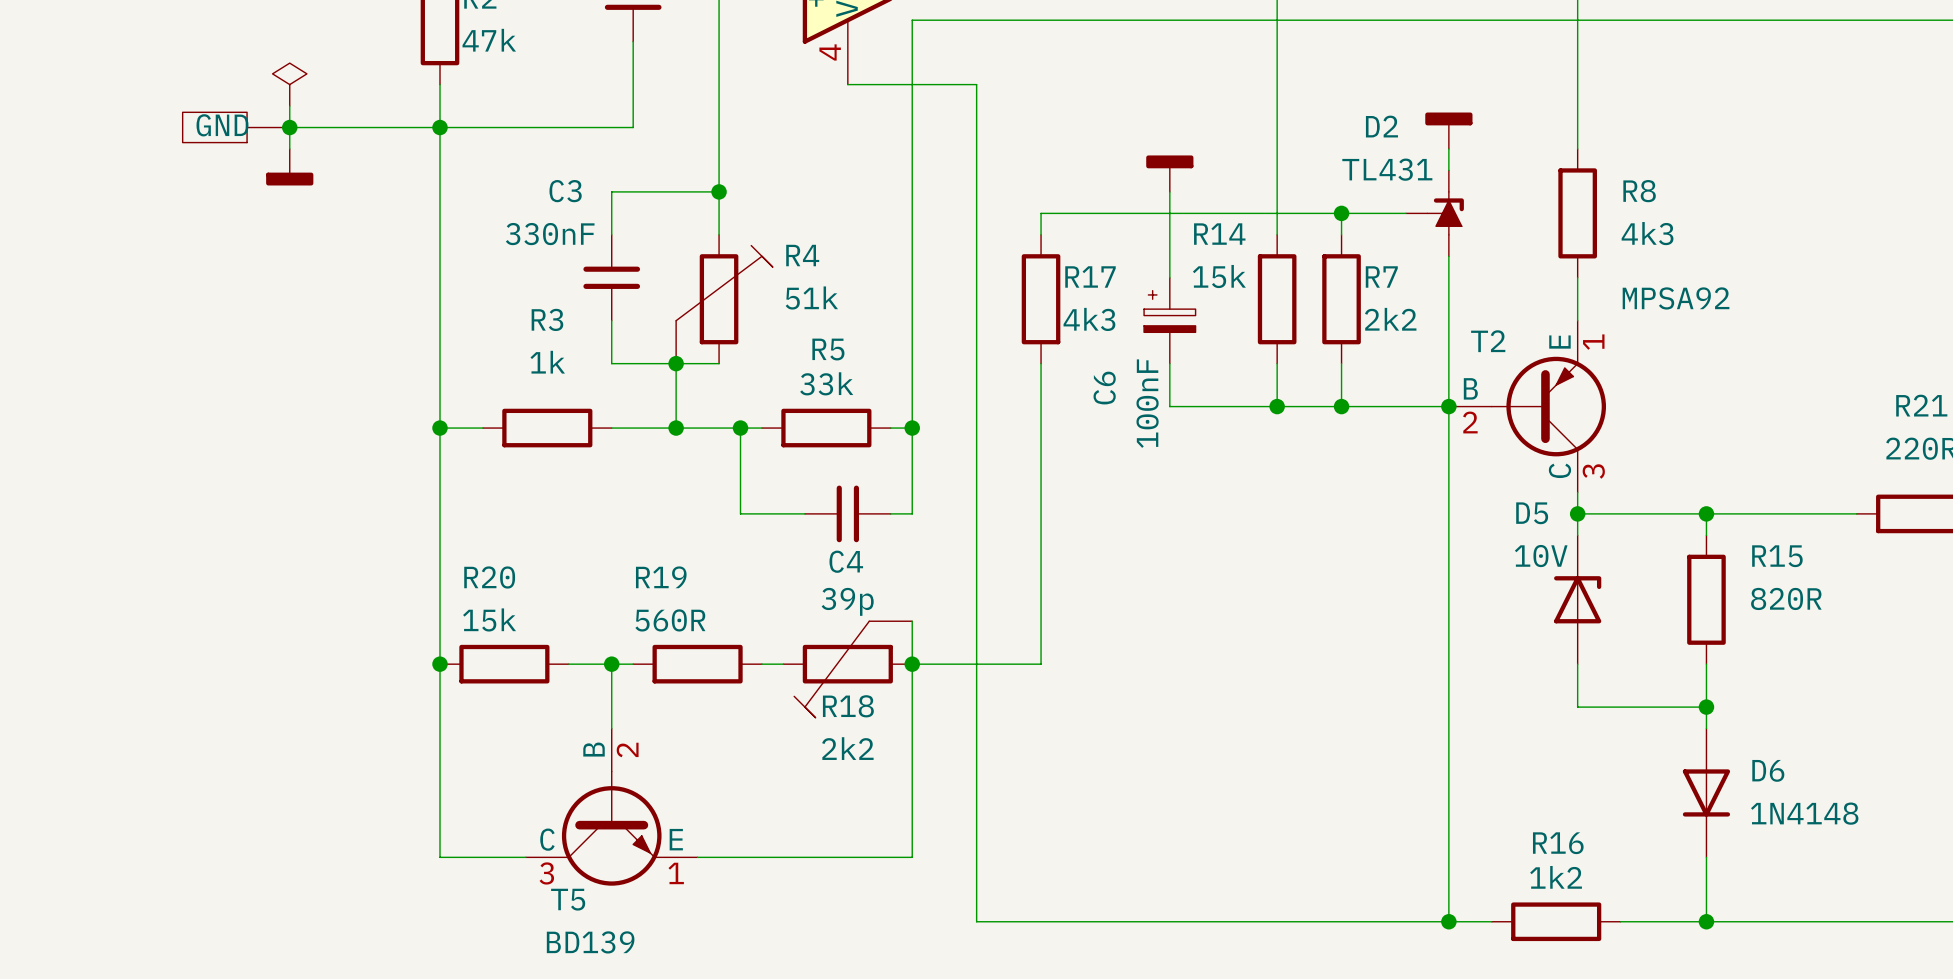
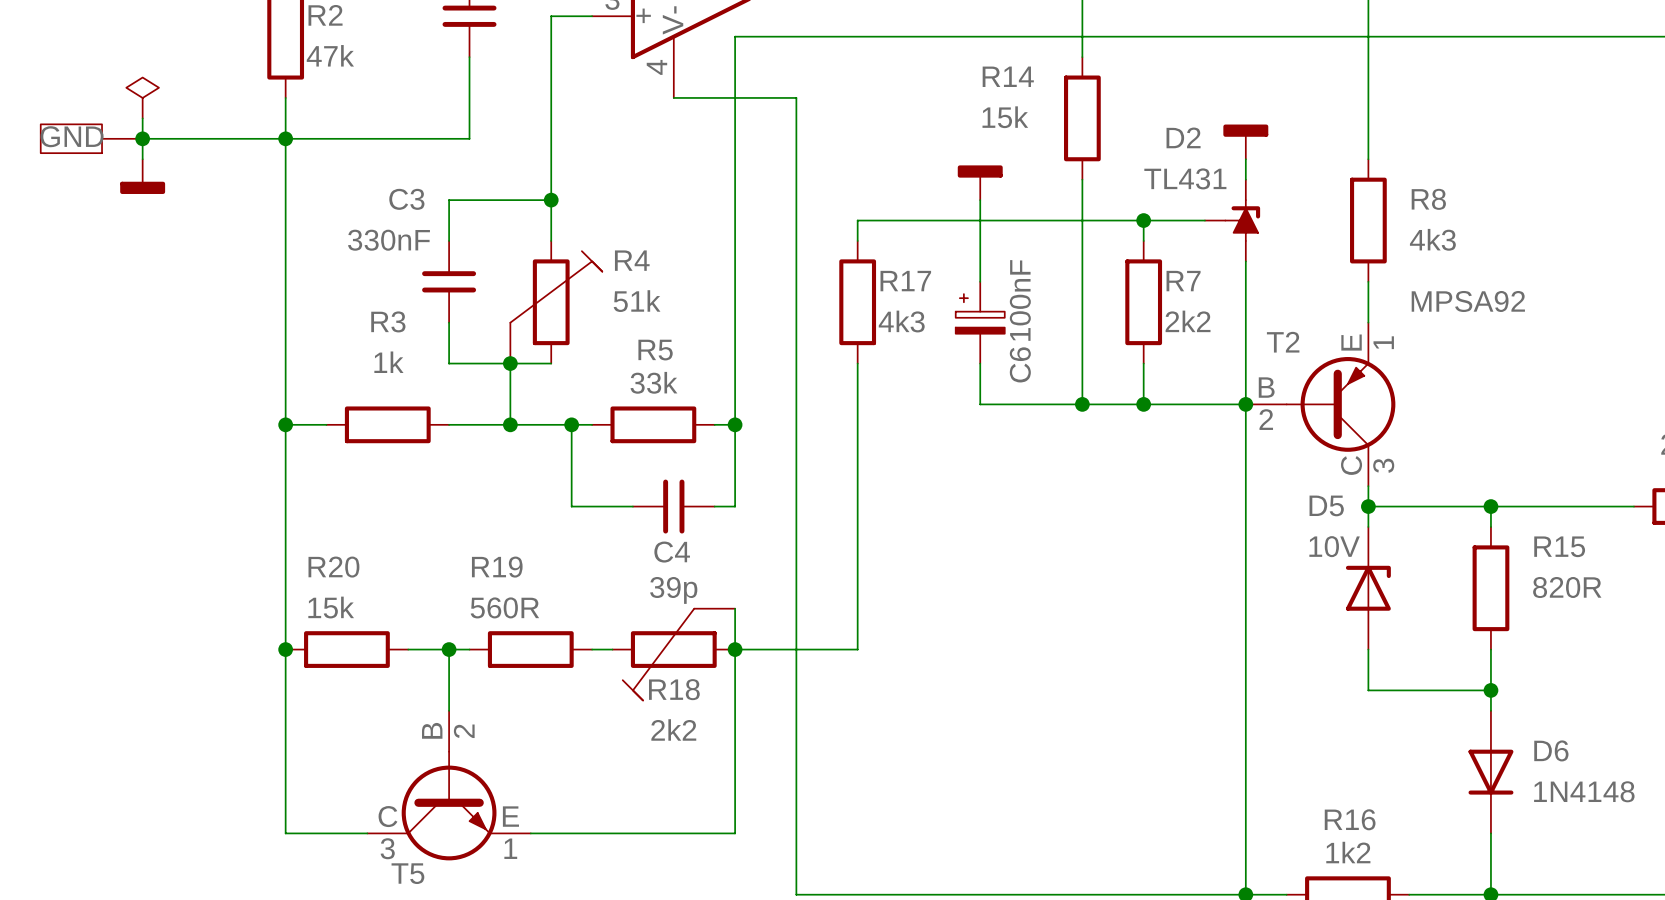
wire: (1277, 41) (1277, 170) -> (1082, 240) (1082, 363)
R14 name position: R14 (1219, 234) -> R14 (1008, 76)
R14 value position: 15k (1219, 276) -> 15k (1005, 117)
R14 position: (1277, 299) -> (1082, 118)
C6 name position: C6 (1104, 388) -> C6 (1020, 364)
C6 value position: 100nF (1147, 403) -> 100nF (1020, 300)

